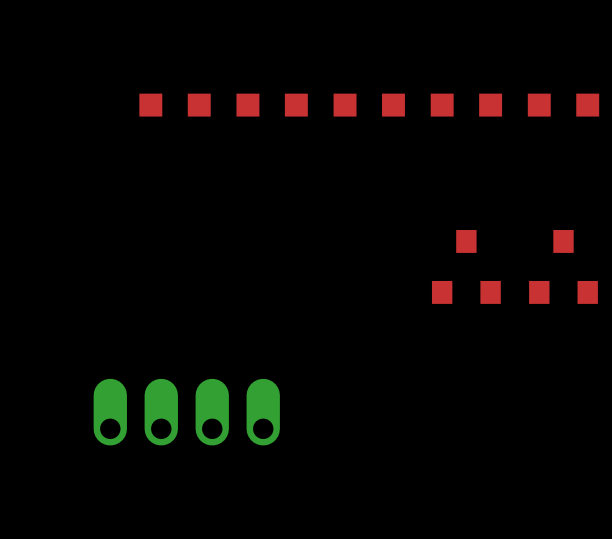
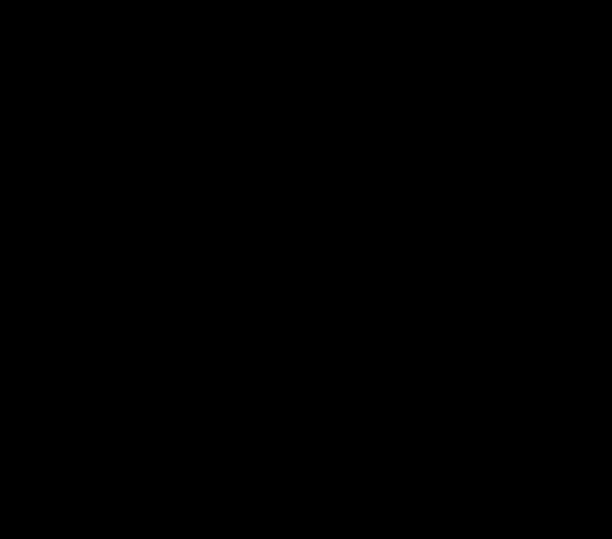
part: (175, 105) -> none
part: (272, 105) -> none
part: (369, 105) -> none
part: (466, 105) -> none
part: (563, 105) -> none
part: (466, 266) -> none
part: (563, 266) -> none
part: (186, 412) -> none

